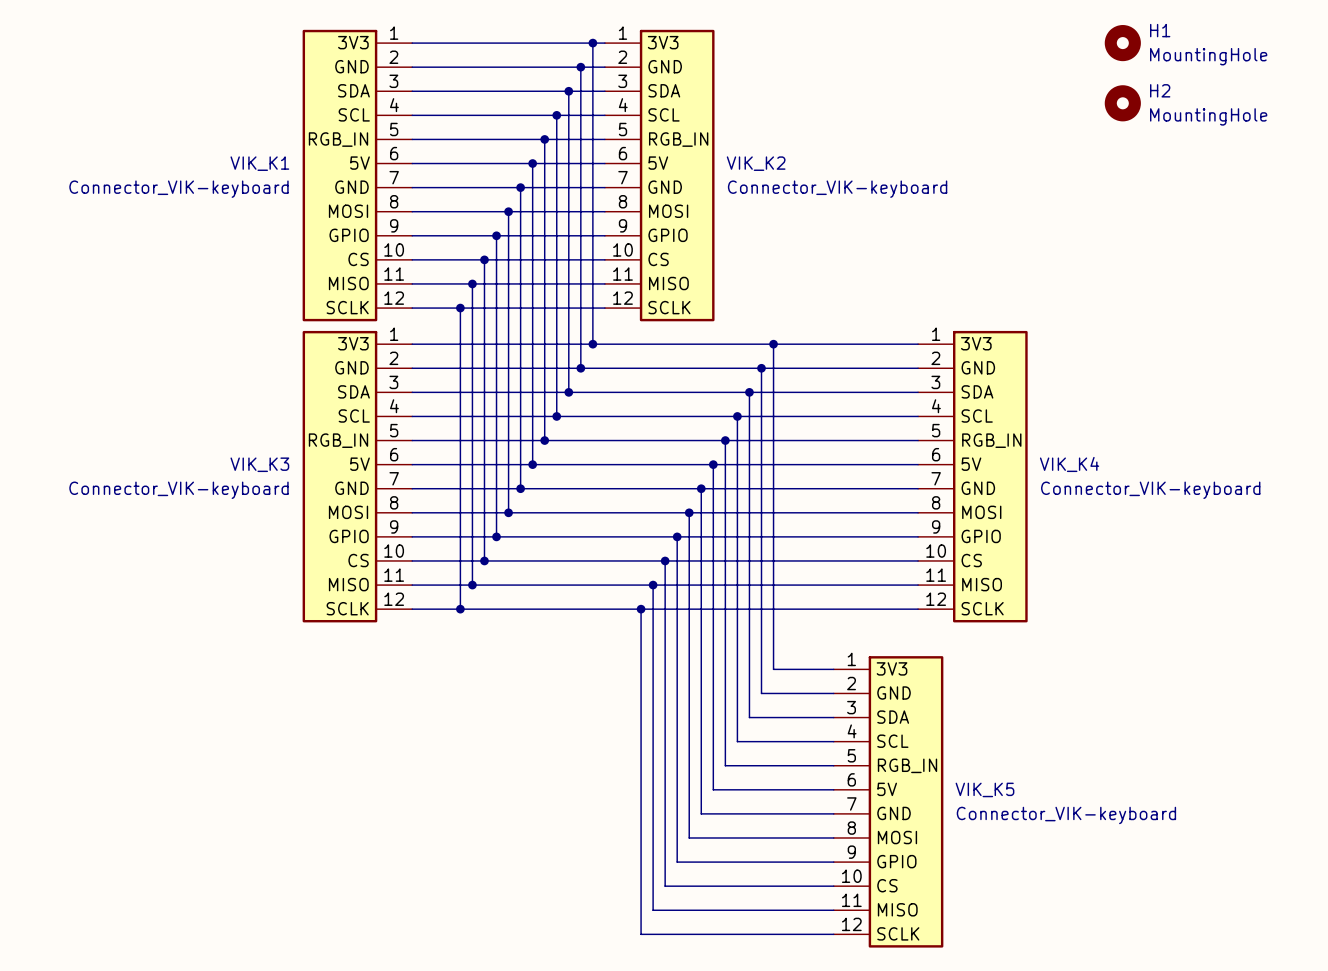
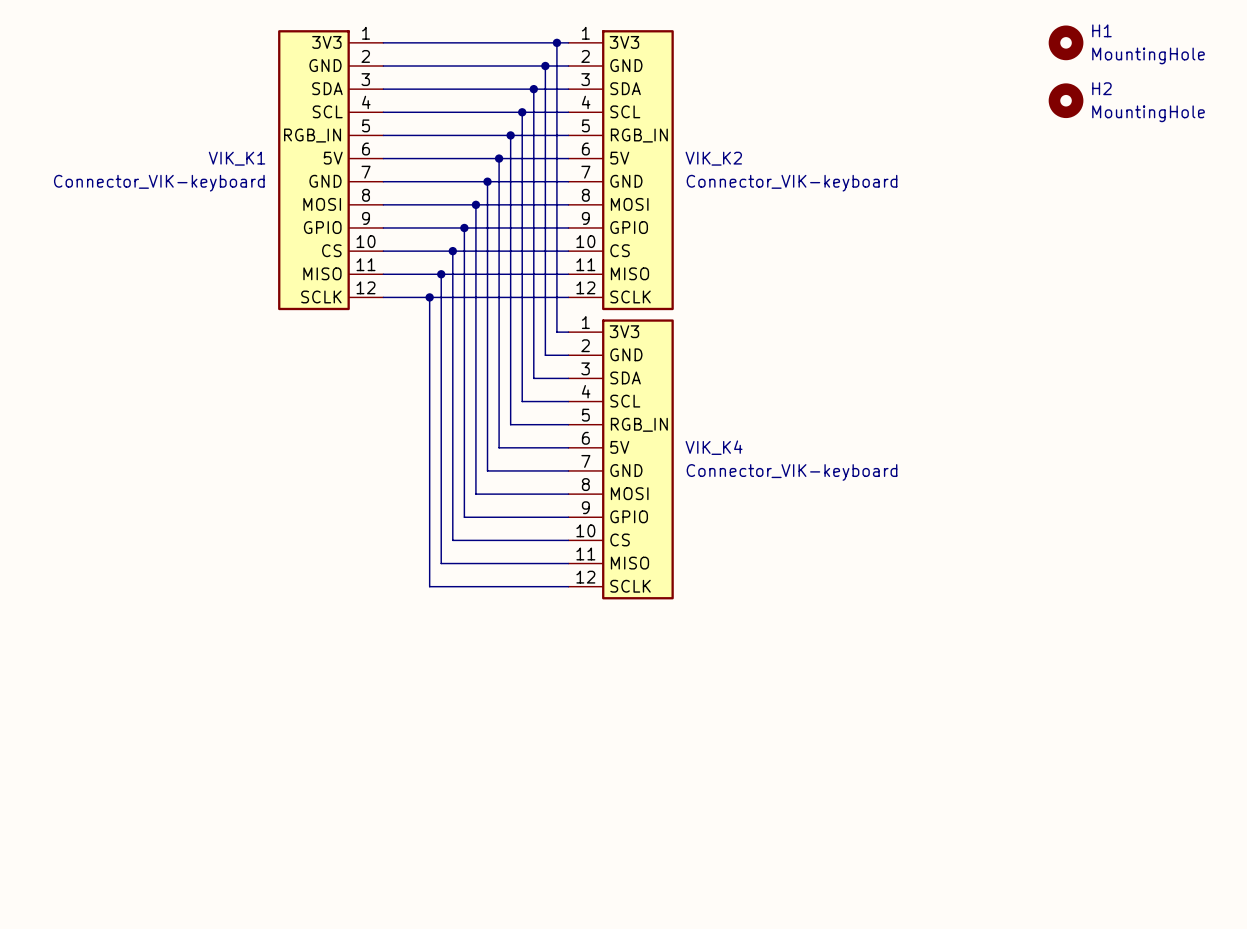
wire: (412, 344) (592, 344) -> none
junction: (592, 344) -> none
wire: (604, 344) (918, 344) -> none
wire: (773, 344) (773, 669) (833, 669) -> none
junction: (773, 344) -> none
wire: (412, 368) (580, 368) -> none
junction: (580, 368) -> none
wire: (604, 368) (918, 368) -> none
wire: (761, 368) (761, 693) (833, 693) -> none
junction: (761, 368) -> none
wire: (412, 392) (568, 392) -> none
junction: (568, 392) -> none
wire: (604, 392) (918, 392) -> none
wire: (749, 392) (749, 717) (833, 717) -> none
junction: (749, 392) -> none
wire: (412, 416) (556, 416) -> none
junction: (556, 416) -> none
wire: (604, 416) (918, 416) -> none
wire: (737, 416) (737, 741) (833, 741) -> none
junction: (737, 416) -> none
wire: (412, 440) (544, 440) -> none
junction: (544, 440) -> none
wire: (604, 440) (918, 440) -> none
wire: (725, 440) (725, 765) (833, 765) -> none
junction: (725, 440) -> none
wire: (412, 464) (532, 464) -> none
junction: (532, 464) -> none
wire: (604, 464) (918, 464) -> none
wire: (713, 464) (713, 789) (833, 789) -> none
junction: (713, 464) -> none
VIK_K3: Connector_VIK-keyboard (357, 476) -> none
VIK_K4 position: (972, 476) -> (621, 459)
wire: (412, 488) (520, 488) -> none
junction: (520, 488) -> none
wire: (604, 488) (918, 488) -> none
wire: (701, 488) (701, 813) (833, 813) -> none
junction: (701, 488) -> none
wire: (412, 512) (508, 512) -> none
junction: (508, 512) -> none
wire: (604, 512) (918, 512) -> none
wire: (689, 512) (689, 837) (833, 837) -> none
junction: (689, 512) -> none
wire: (412, 536) (496, 536) -> none
junction: (496, 536) -> none
wire: (604, 536) (918, 536) -> none
wire: (677, 536) (677, 862) (833, 862) -> none
junction: (677, 536) -> none
wire: (412, 560) (484, 560) -> none
junction: (484, 560) -> none
wire: (604, 560) (918, 560) -> none
wire: (665, 560) (665, 886) (833, 886) -> none
junction: (665, 560) -> none
wire: (412, 585) (472, 585) -> none
junction: (472, 585) -> none
wire: (604, 585) (918, 585) -> none
wire: (653, 585) (653, 910) (833, 910) -> none
junction: (653, 585) -> none
wire: (412, 609) (460, 609) -> none
junction: (460, 609) -> none
wire: (604, 609) (918, 609) -> none
wire: (641, 609) (641, 934) (833, 934) -> none
junction: (641, 609) -> none
VIK_K5: Connector_VIK-keyboard (888, 801) -> none

